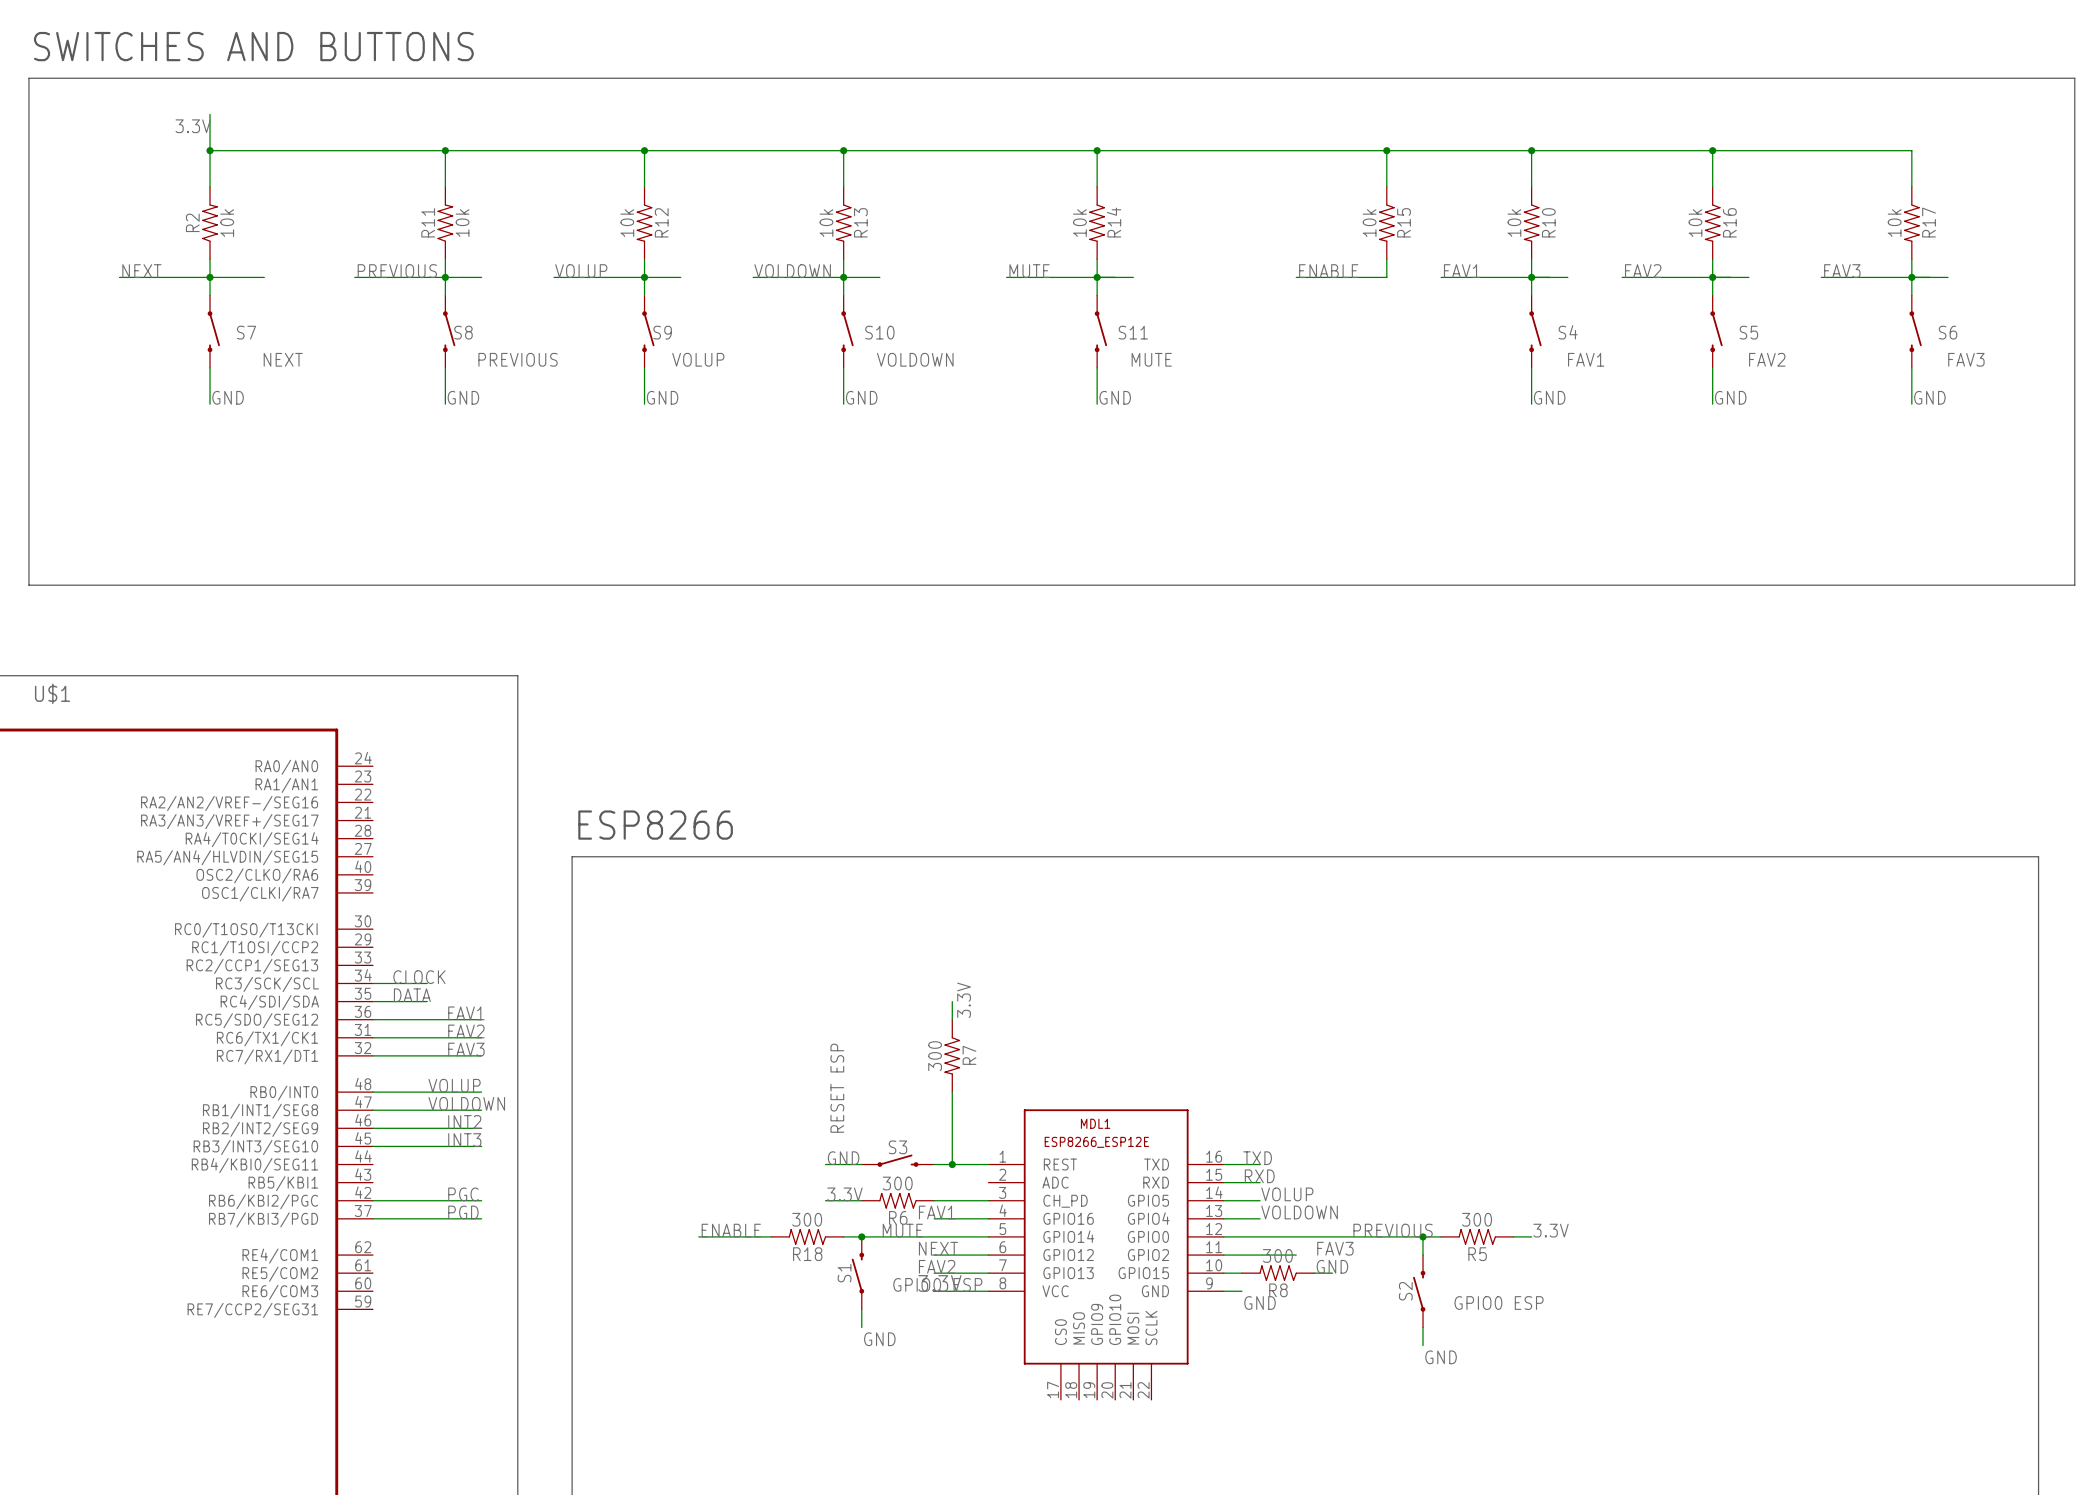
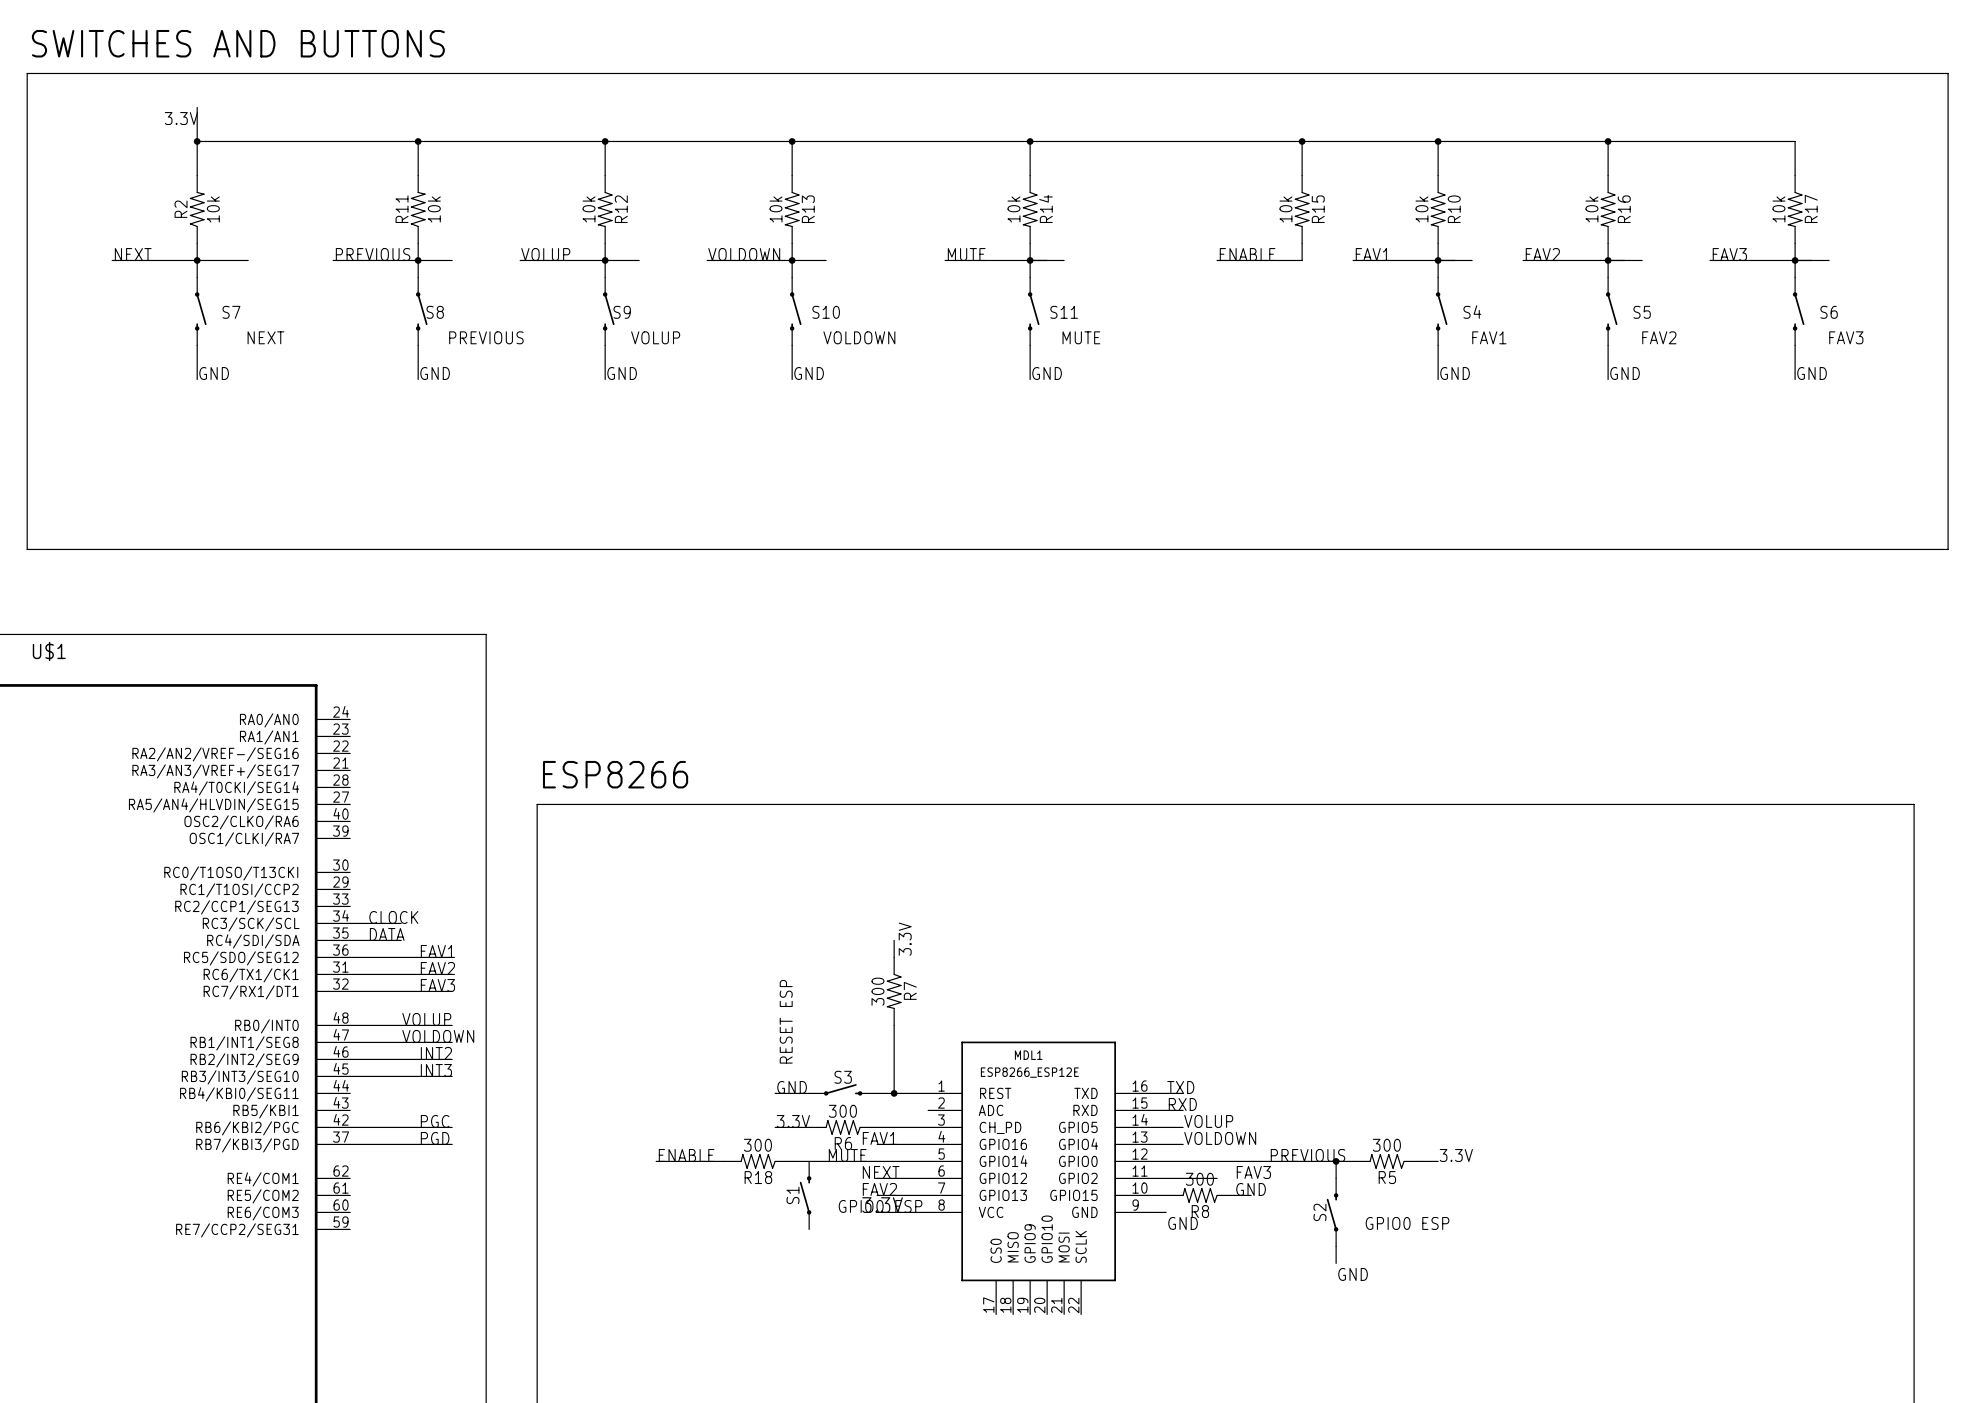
junction: (861, 1236) -> none
wire: (861, 1309) (861, 1327) -> none
label: GND (879, 1339) -> none

